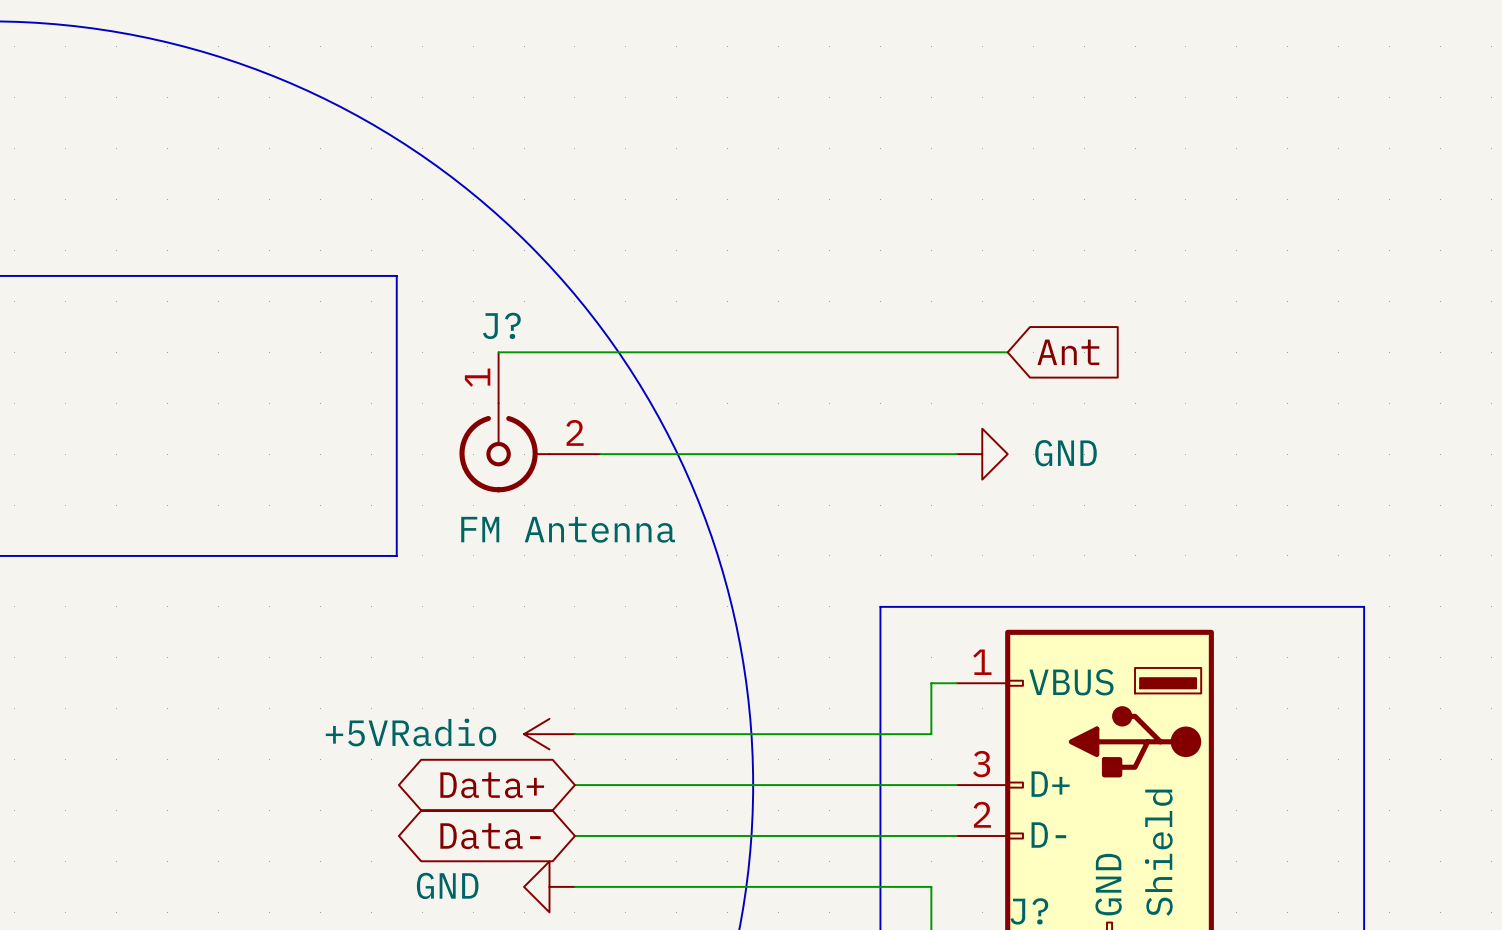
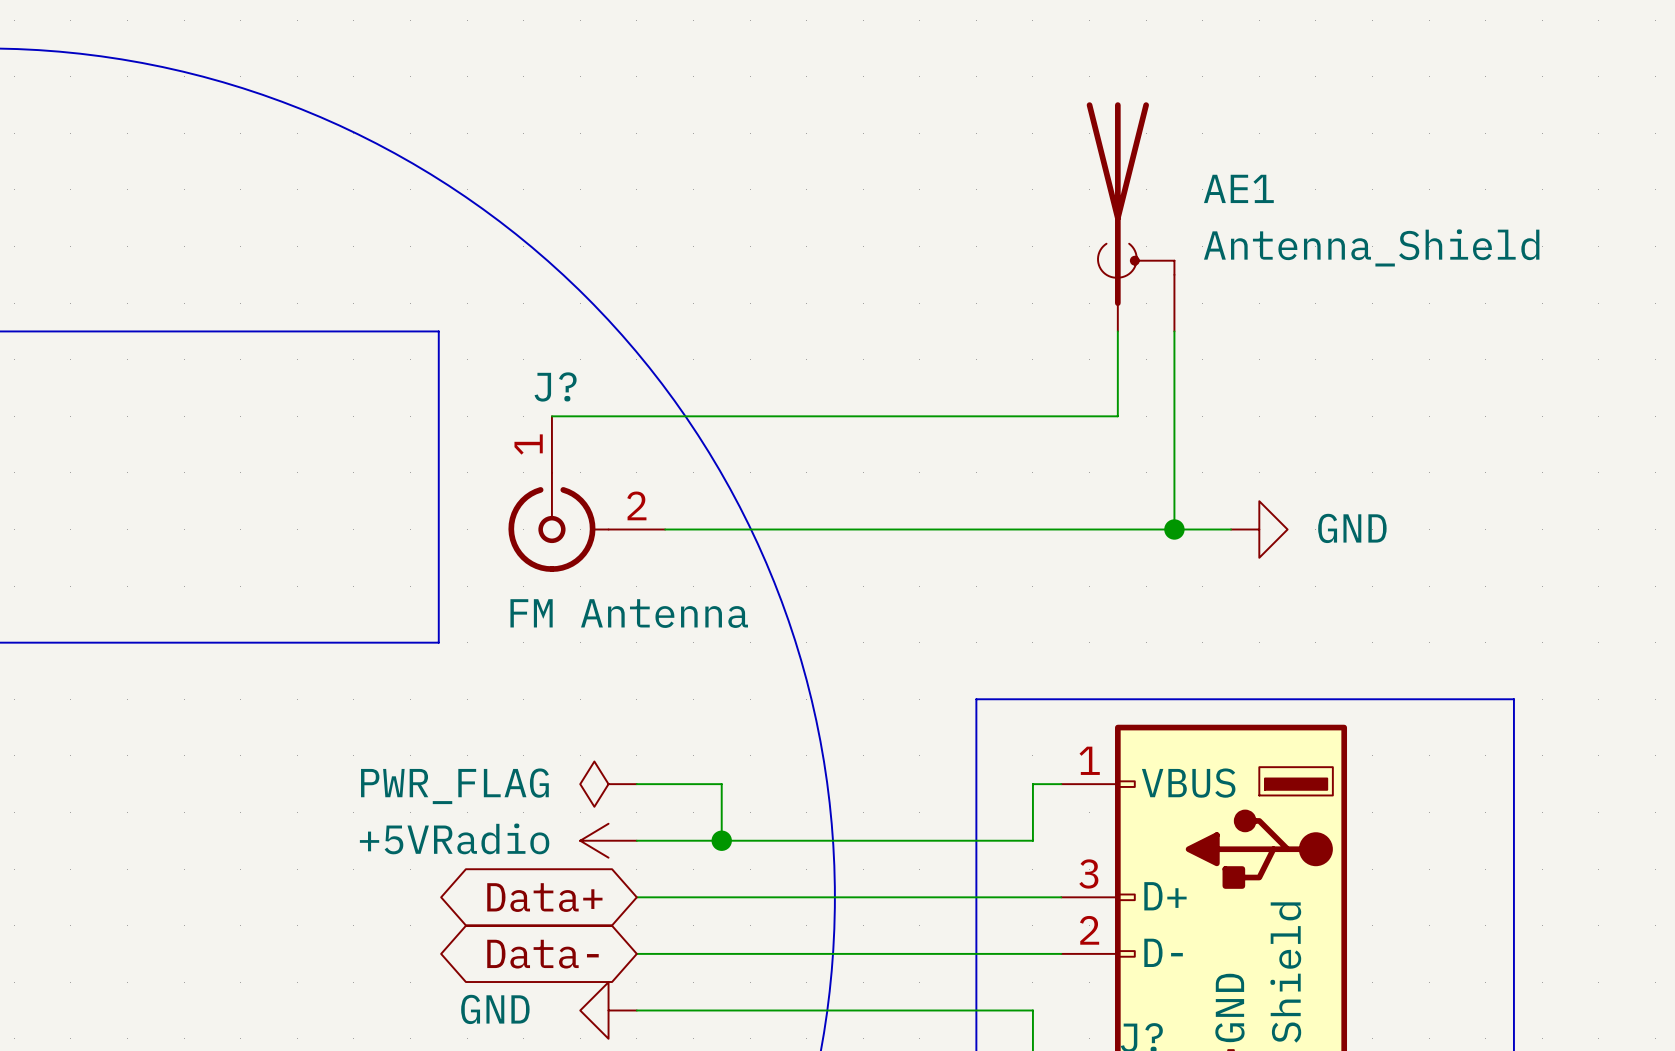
AE1: none -> Antenna_Shield (1130, 216)
wire: none -> (1117, 331) (1117, 416)
wire: none -> (1174, 331) (1174, 529)
global label: Ant (1068, 352) -> none
wire: none -> (1061, 529) (1231, 529)
power symbol position: GND (982, 454) -> GND (1259, 529)
junction: none -> (1174, 529)
power symbol: none -> PWR_FLAG (608, 784)
wire: none -> (636, 784) (721, 784) (721, 840)
junction: none -> (721, 840)

